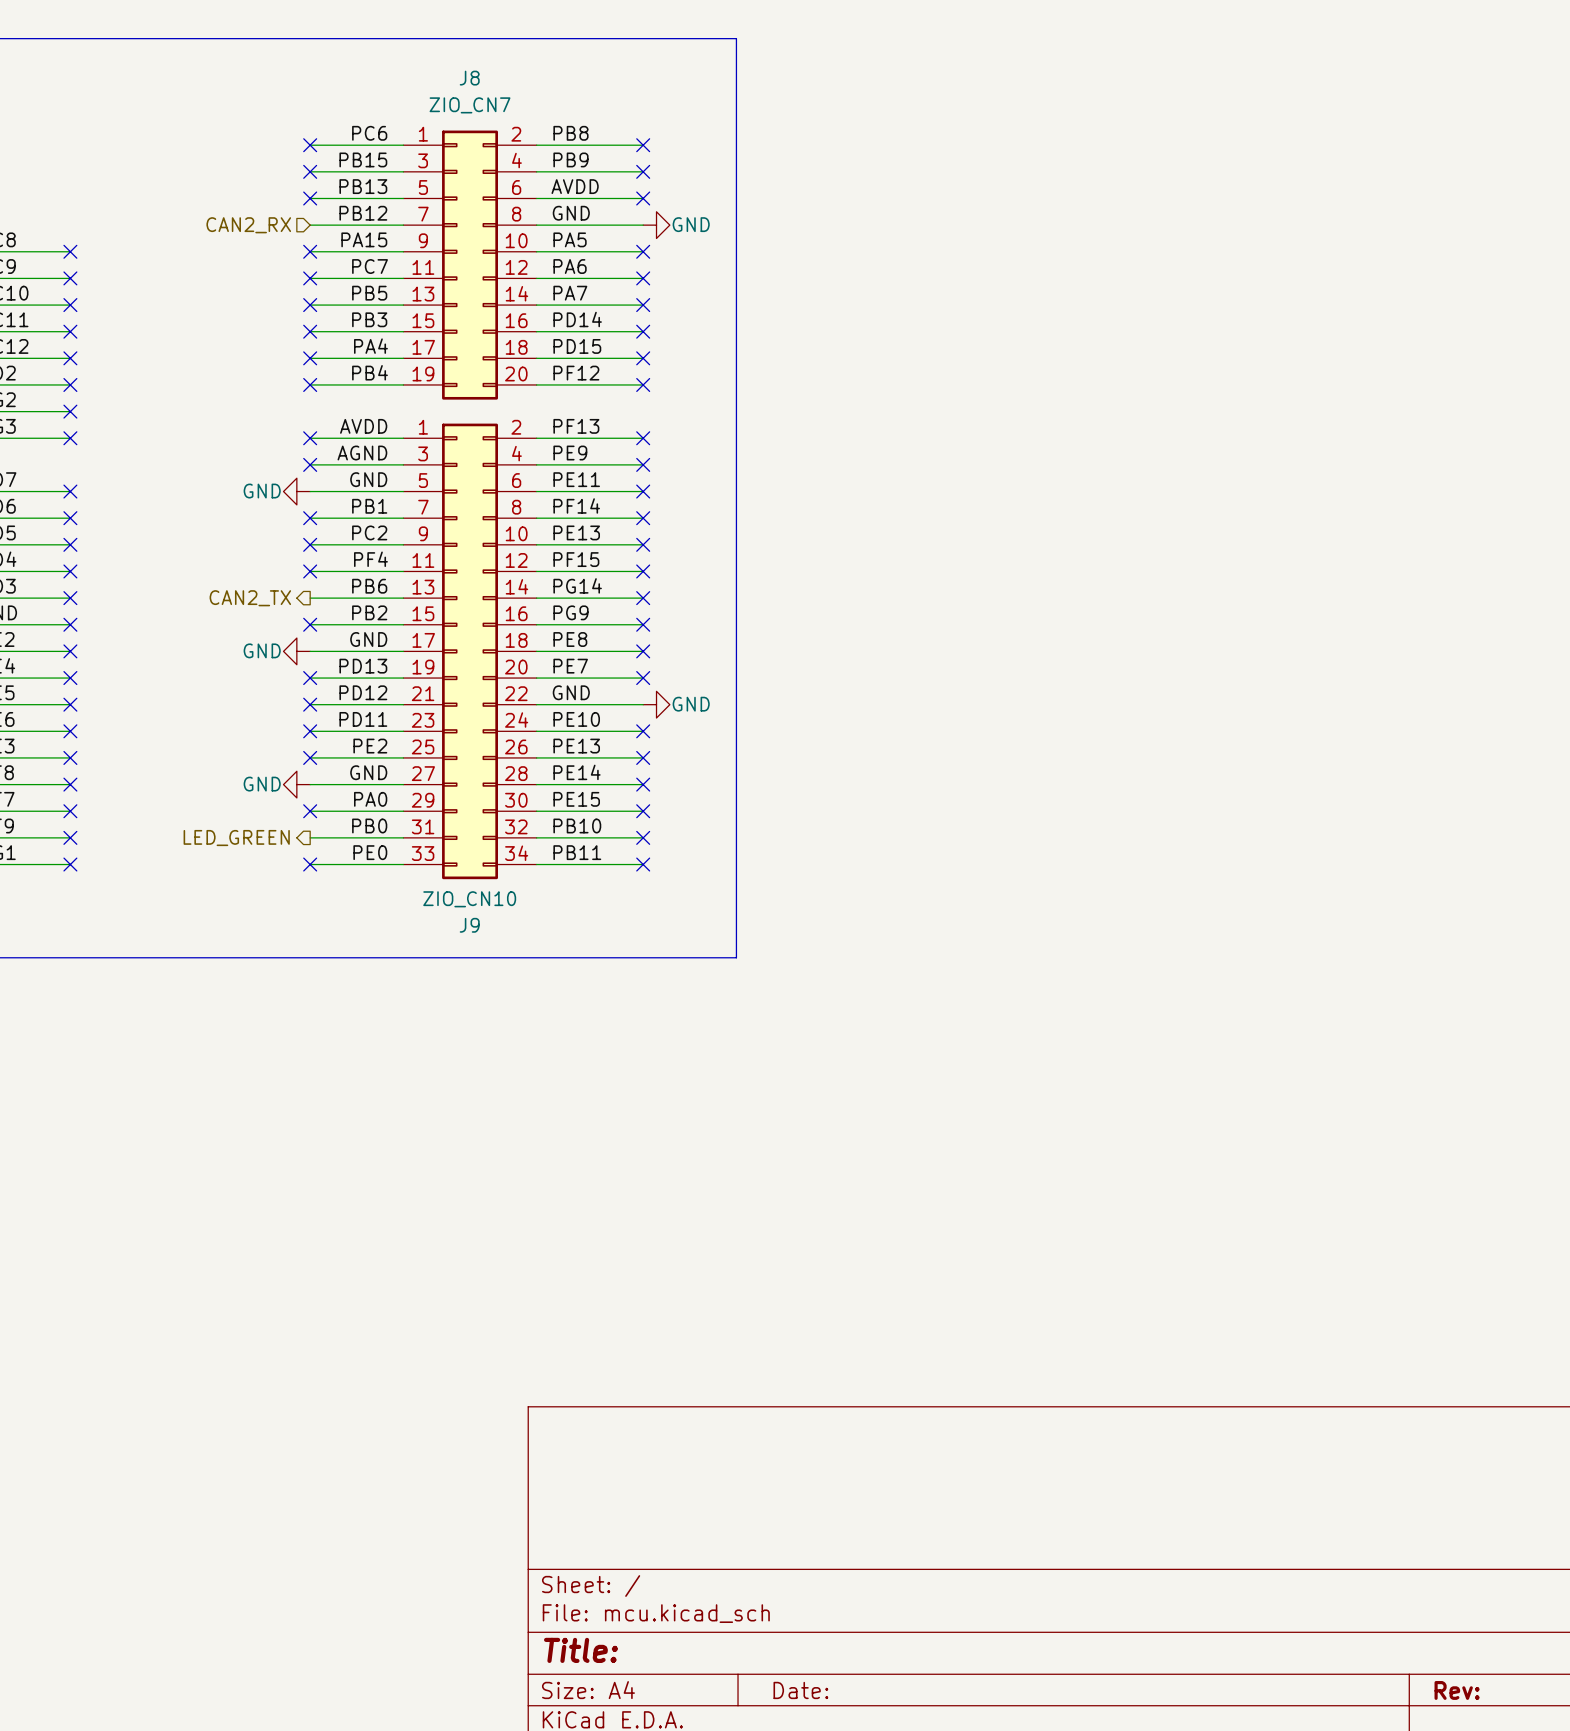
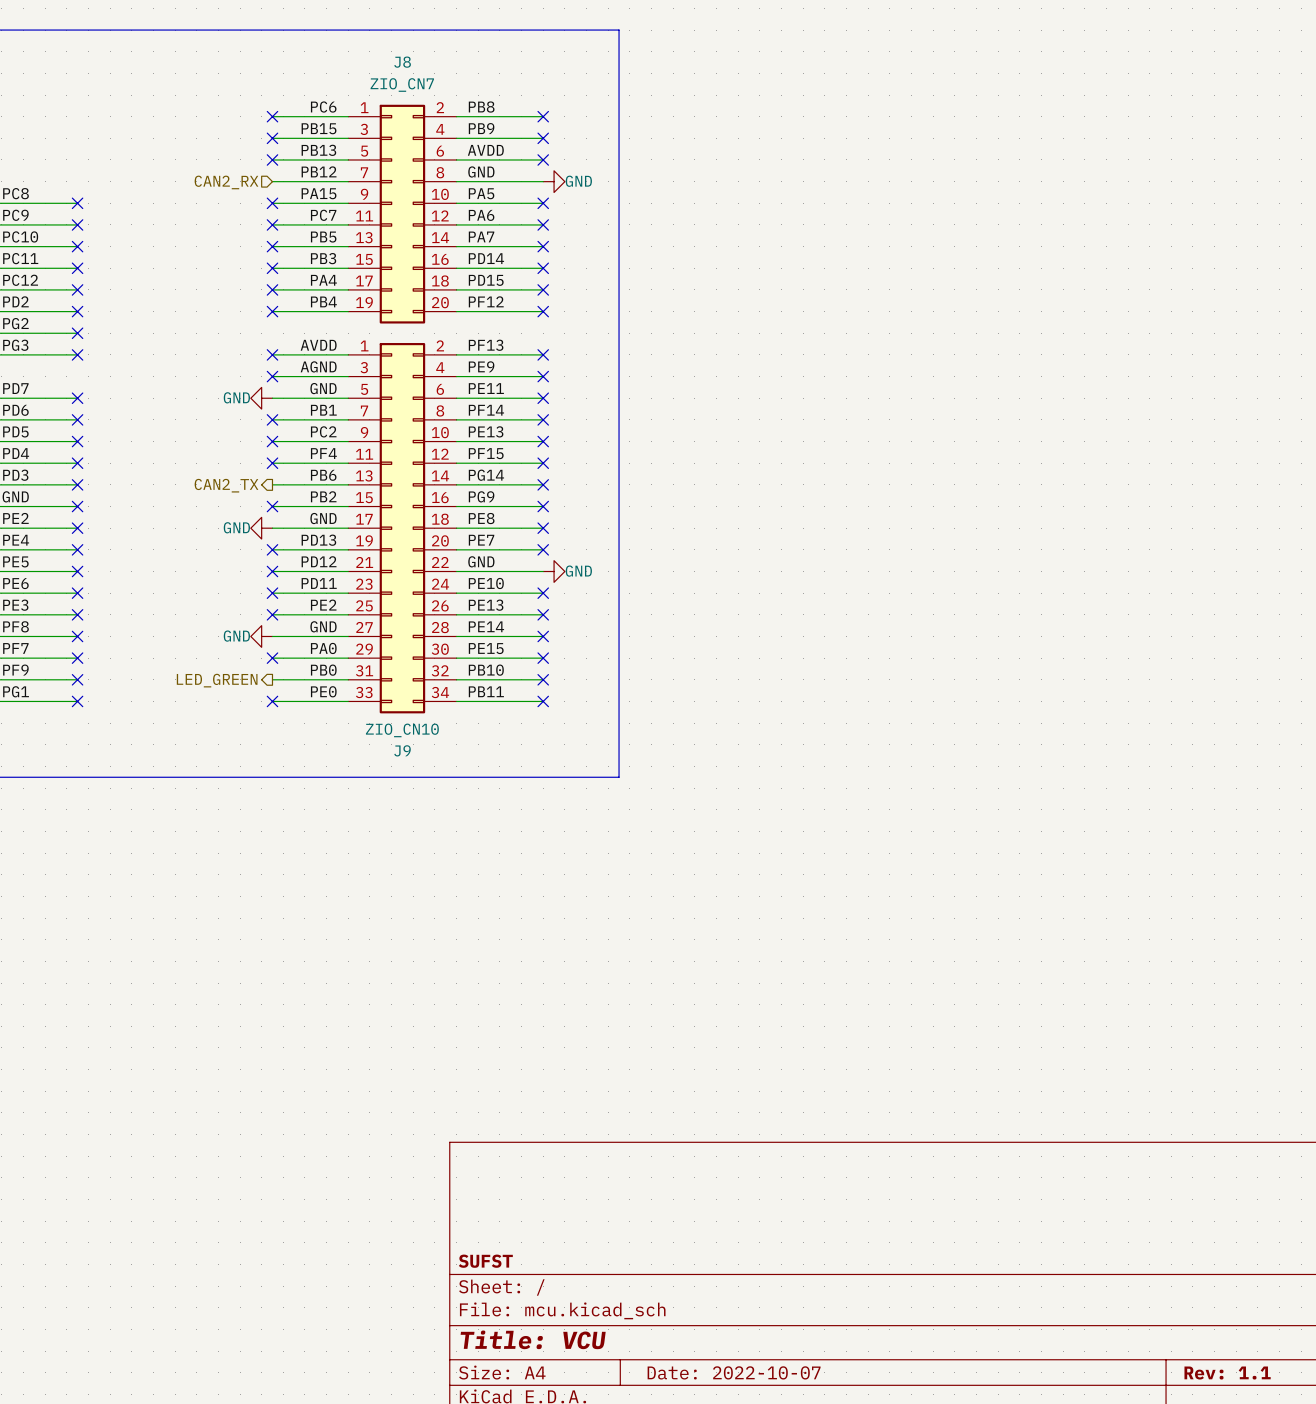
title block: none -> SUFST (485, 1261)
title block: Title: (581, 1650) -> Title: VCU (533, 1339)
title block: Date: (800, 1690) -> Date: 2022-10-07 (734, 1372)
title block: Rev: (1457, 1690) -> Rev: 1.1 (1227, 1373)

